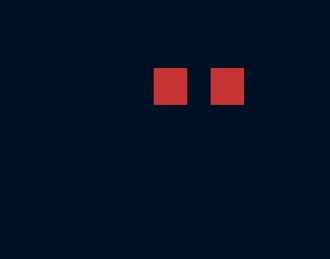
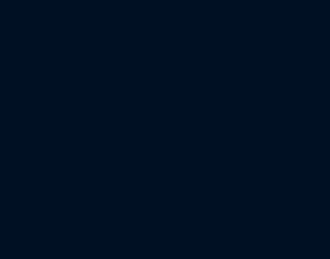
part: (198, 86) -> none

